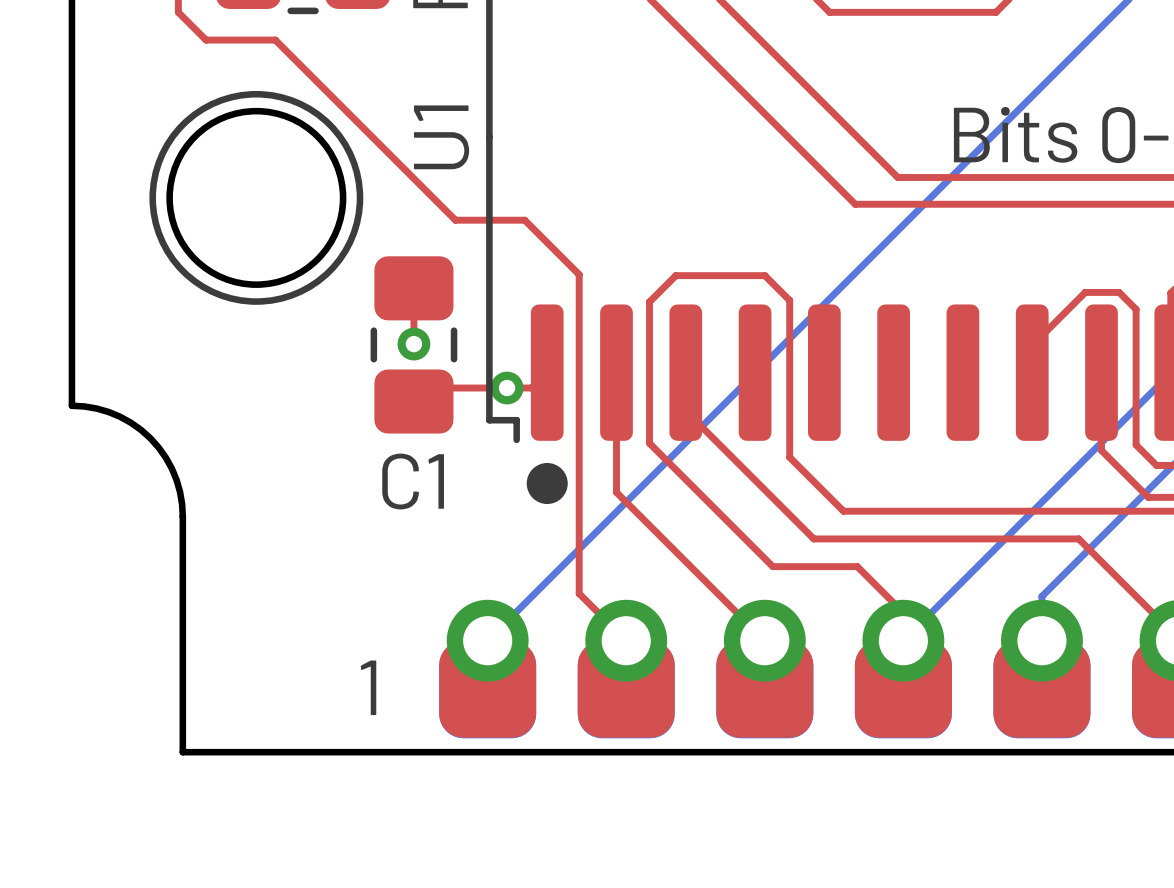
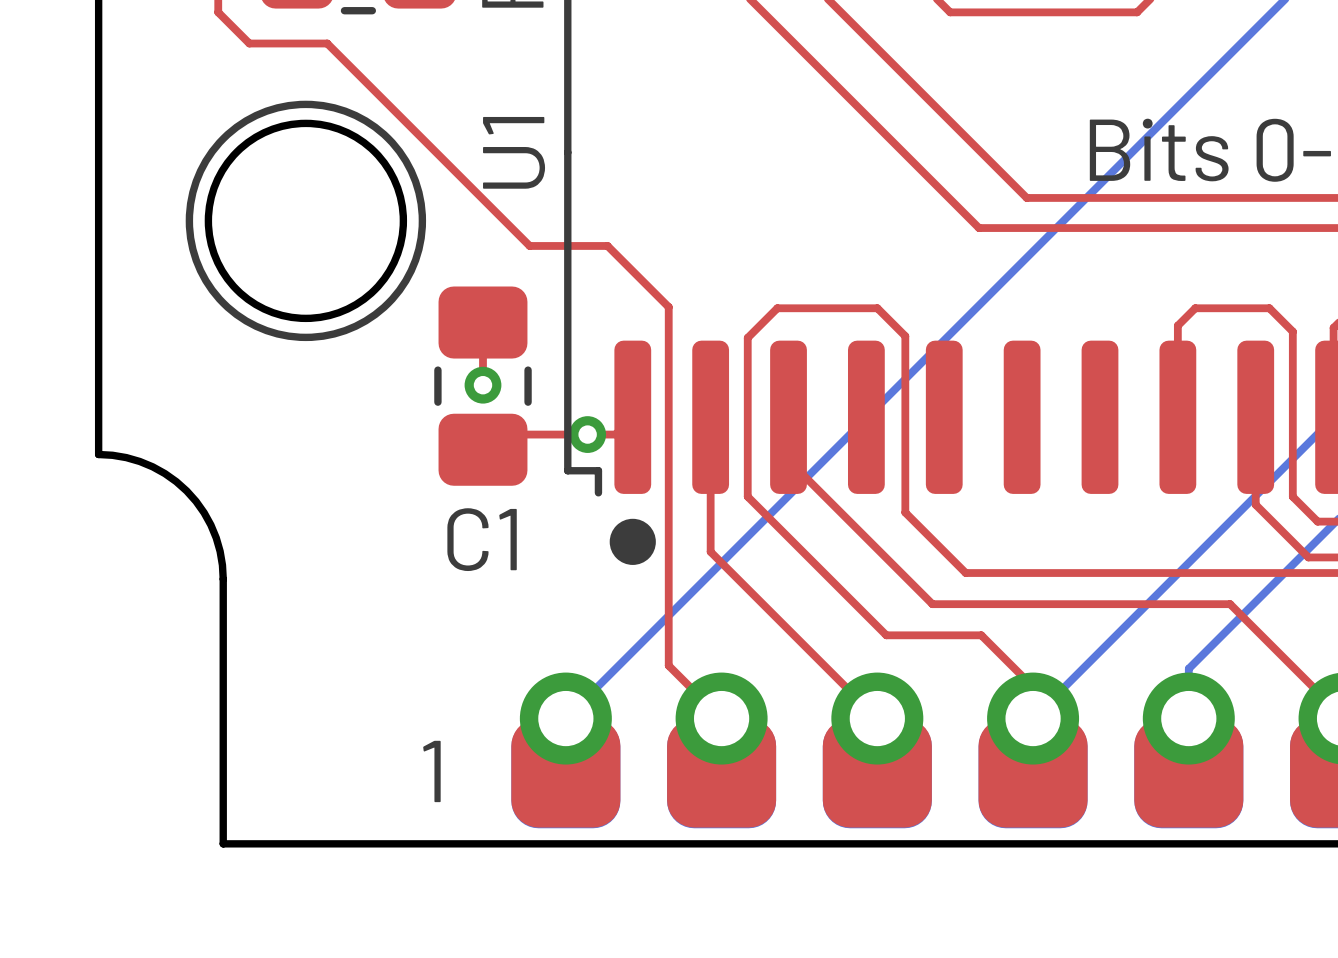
top track: (1032, 345) (1085, 292) (1119, 292) (1136, 309) (1136, 444) -> (1177, 386) (1177, 325) (1195, 308) (1269, 308) (1292, 331) (1292, 496) (1294, 498)

